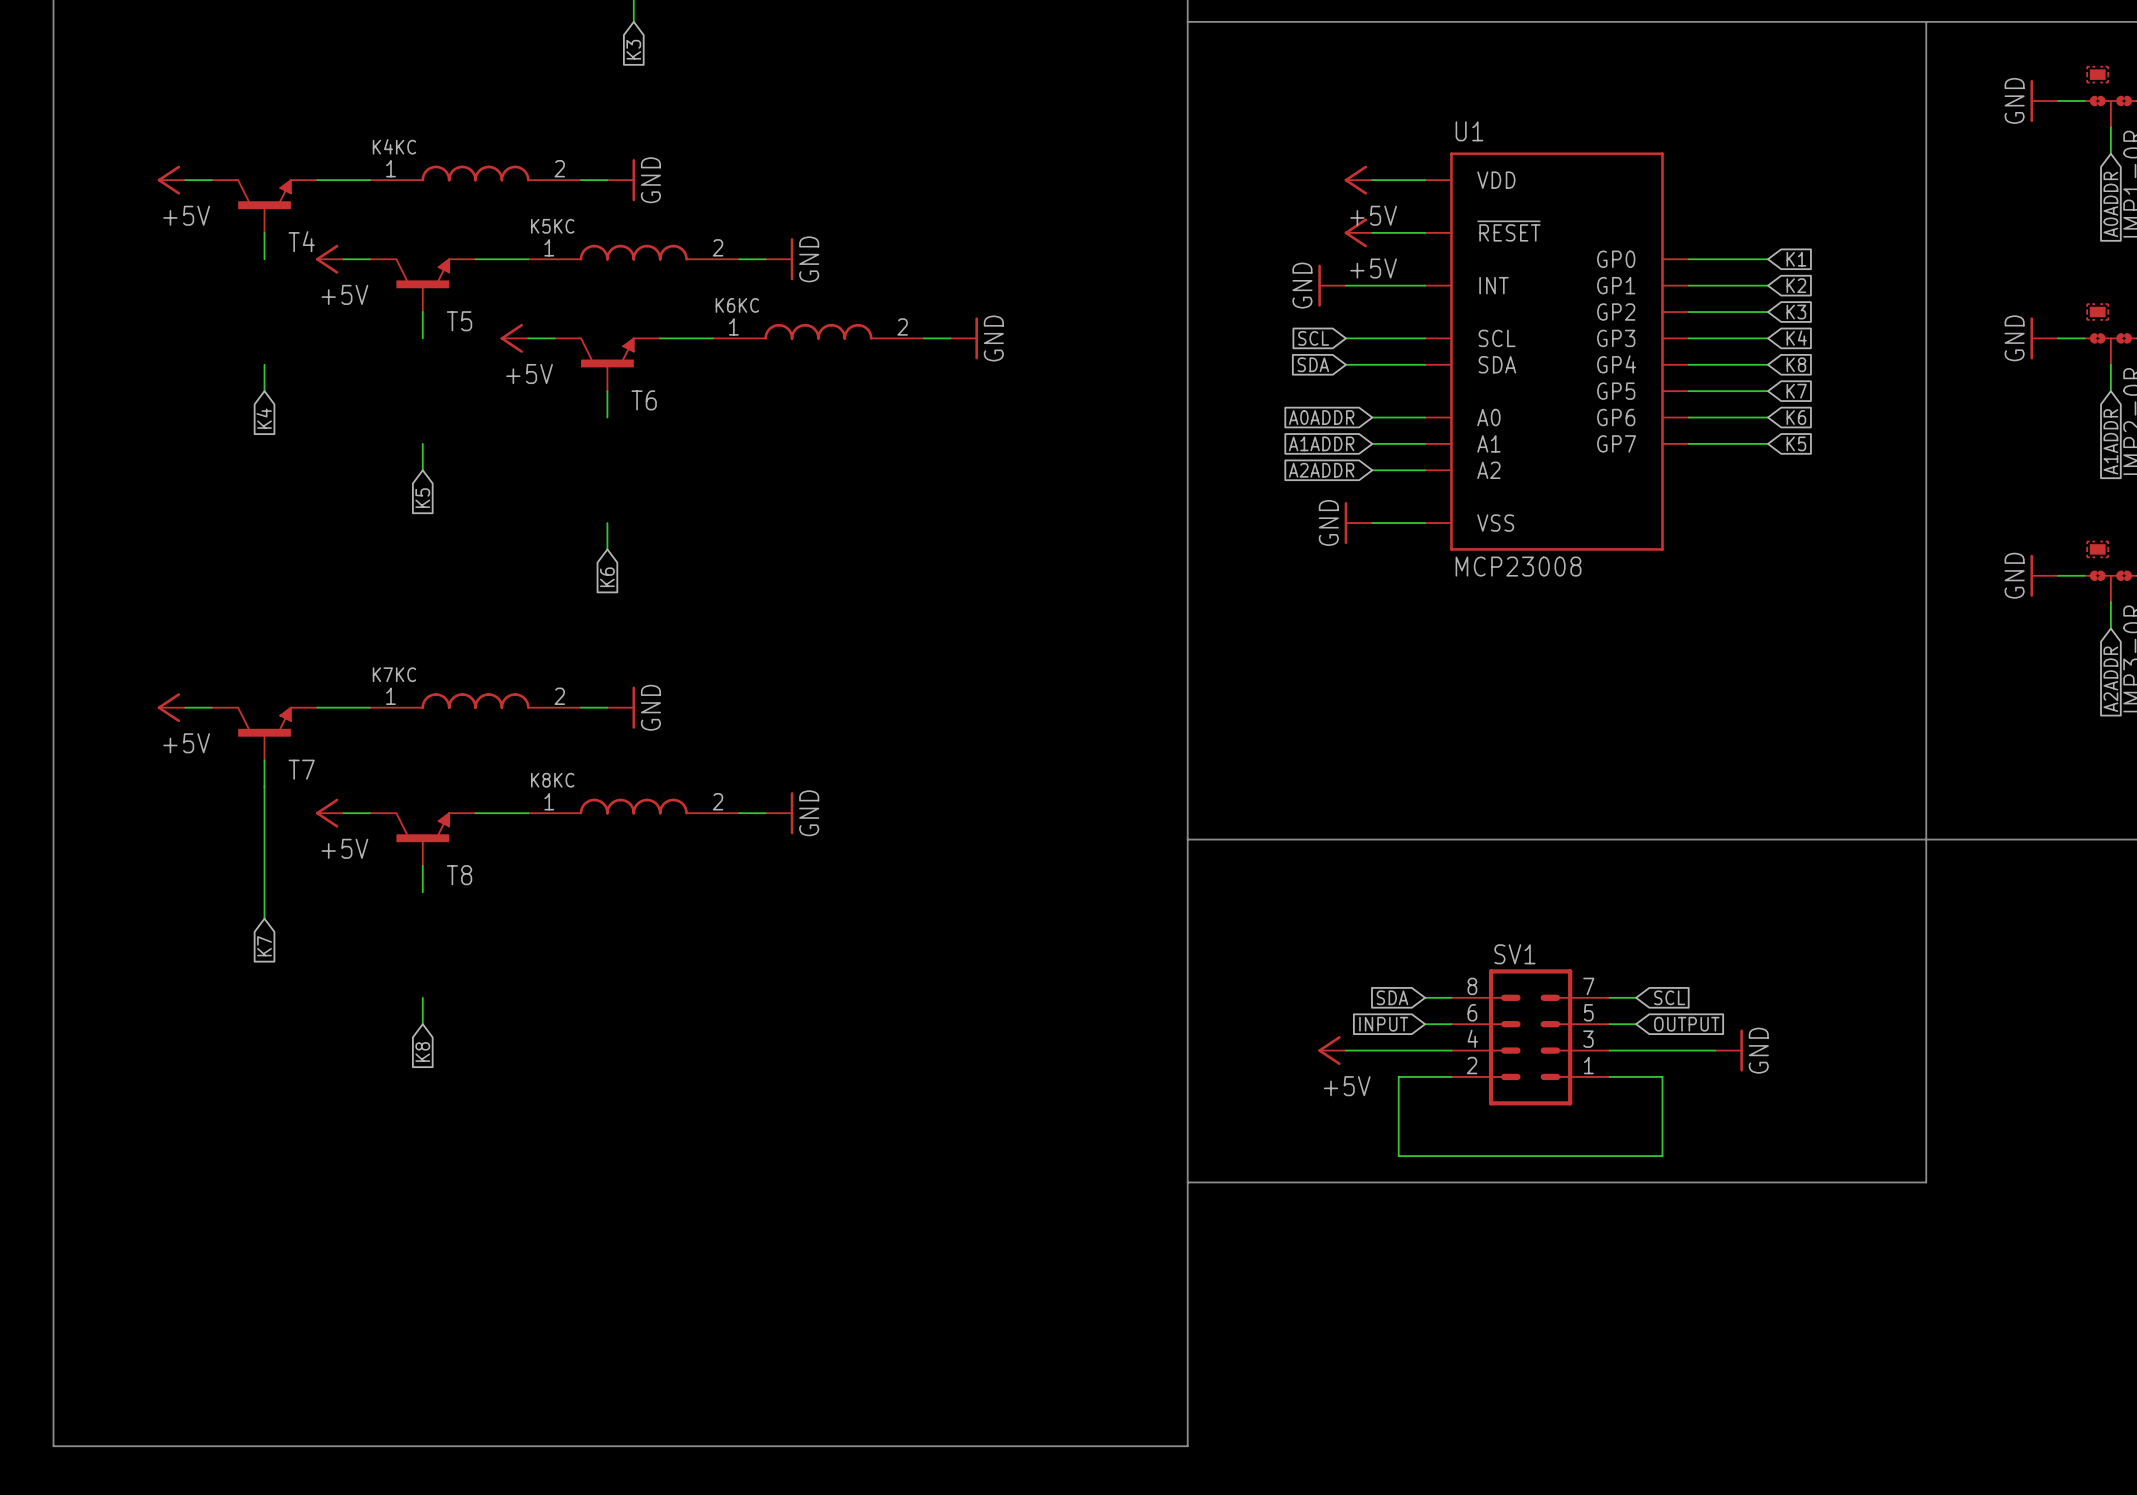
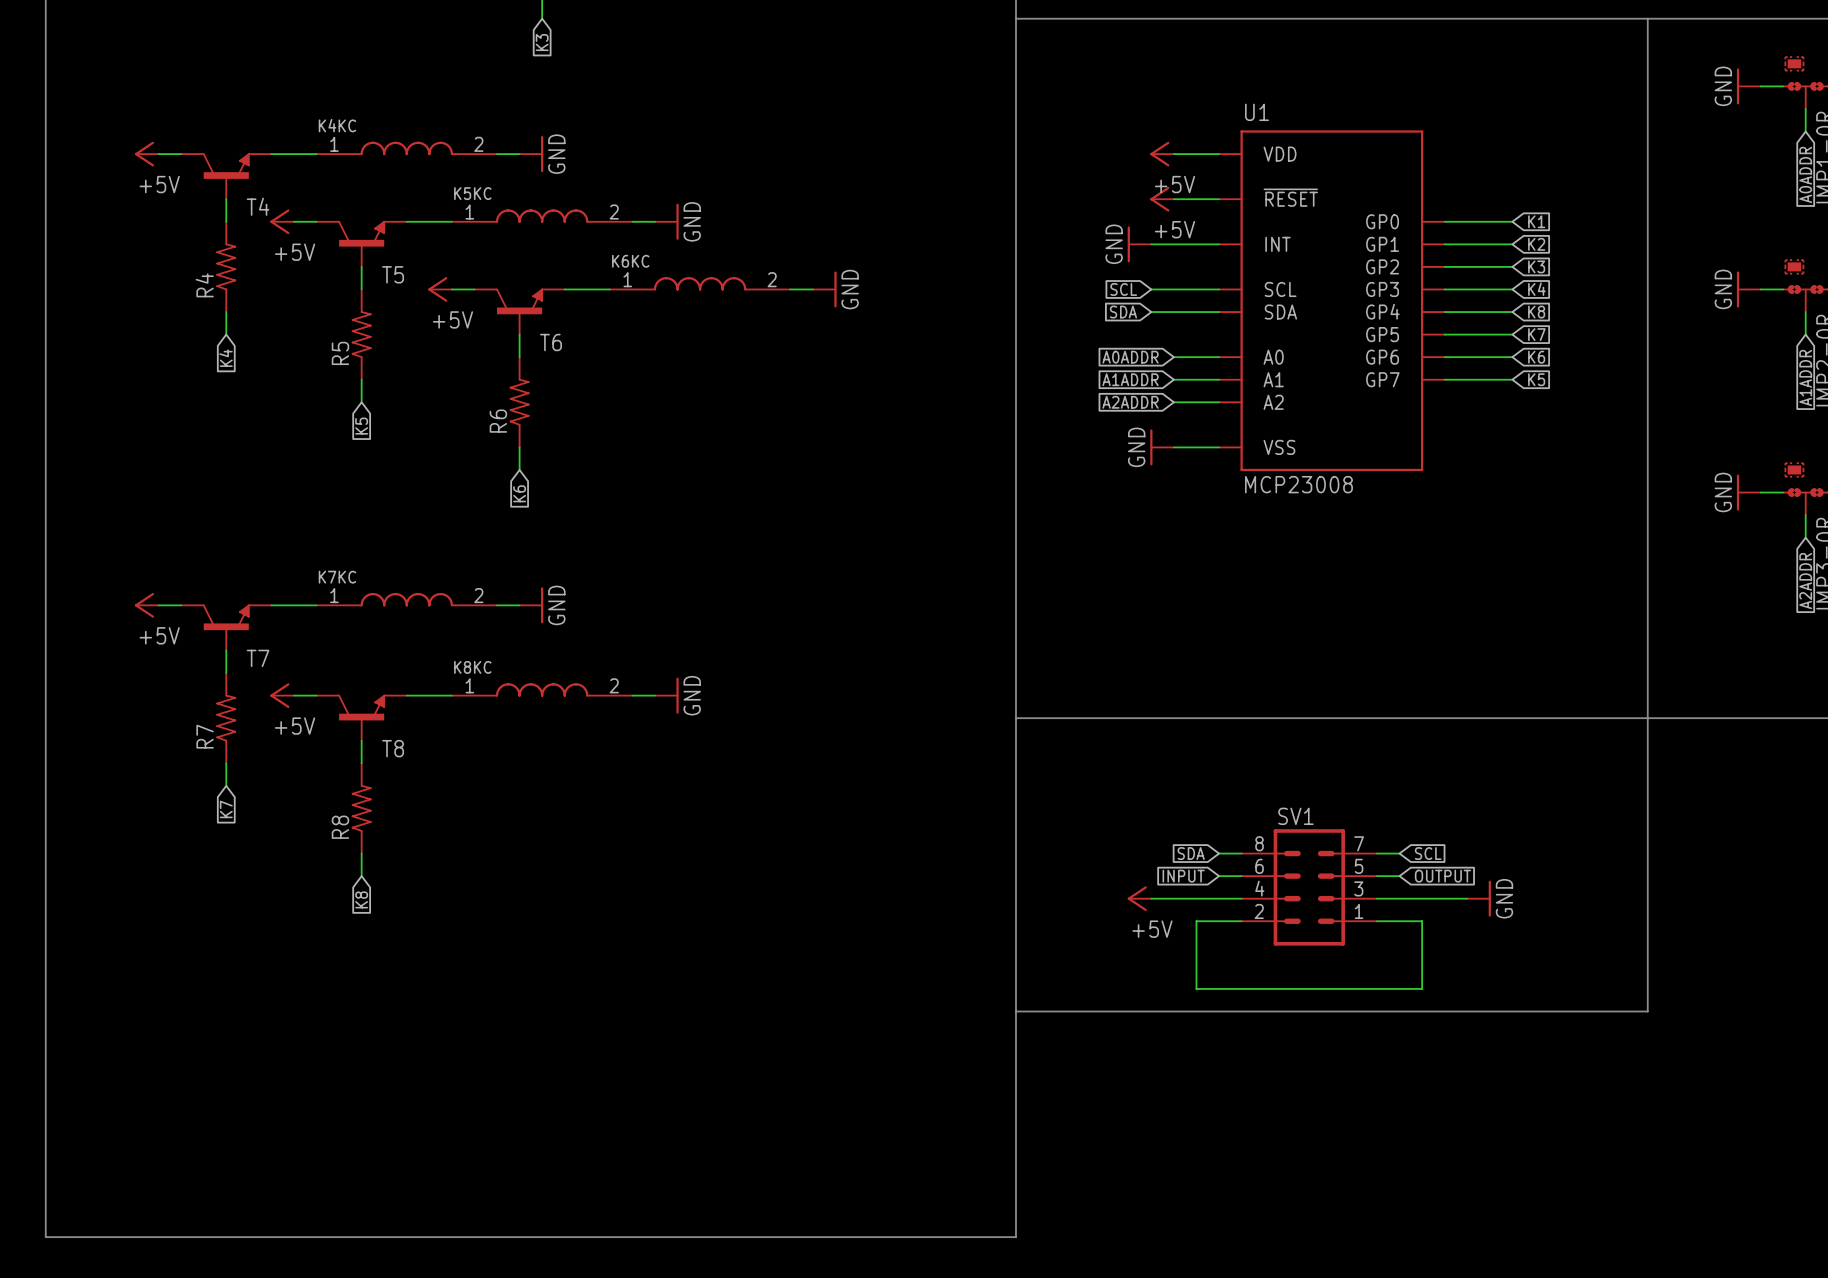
R4: none -> (226, 266)
R5: none -> (361, 334)
R6: none -> (519, 402)
R7: none -> (226, 718)
R8: none -> (361, 808)

